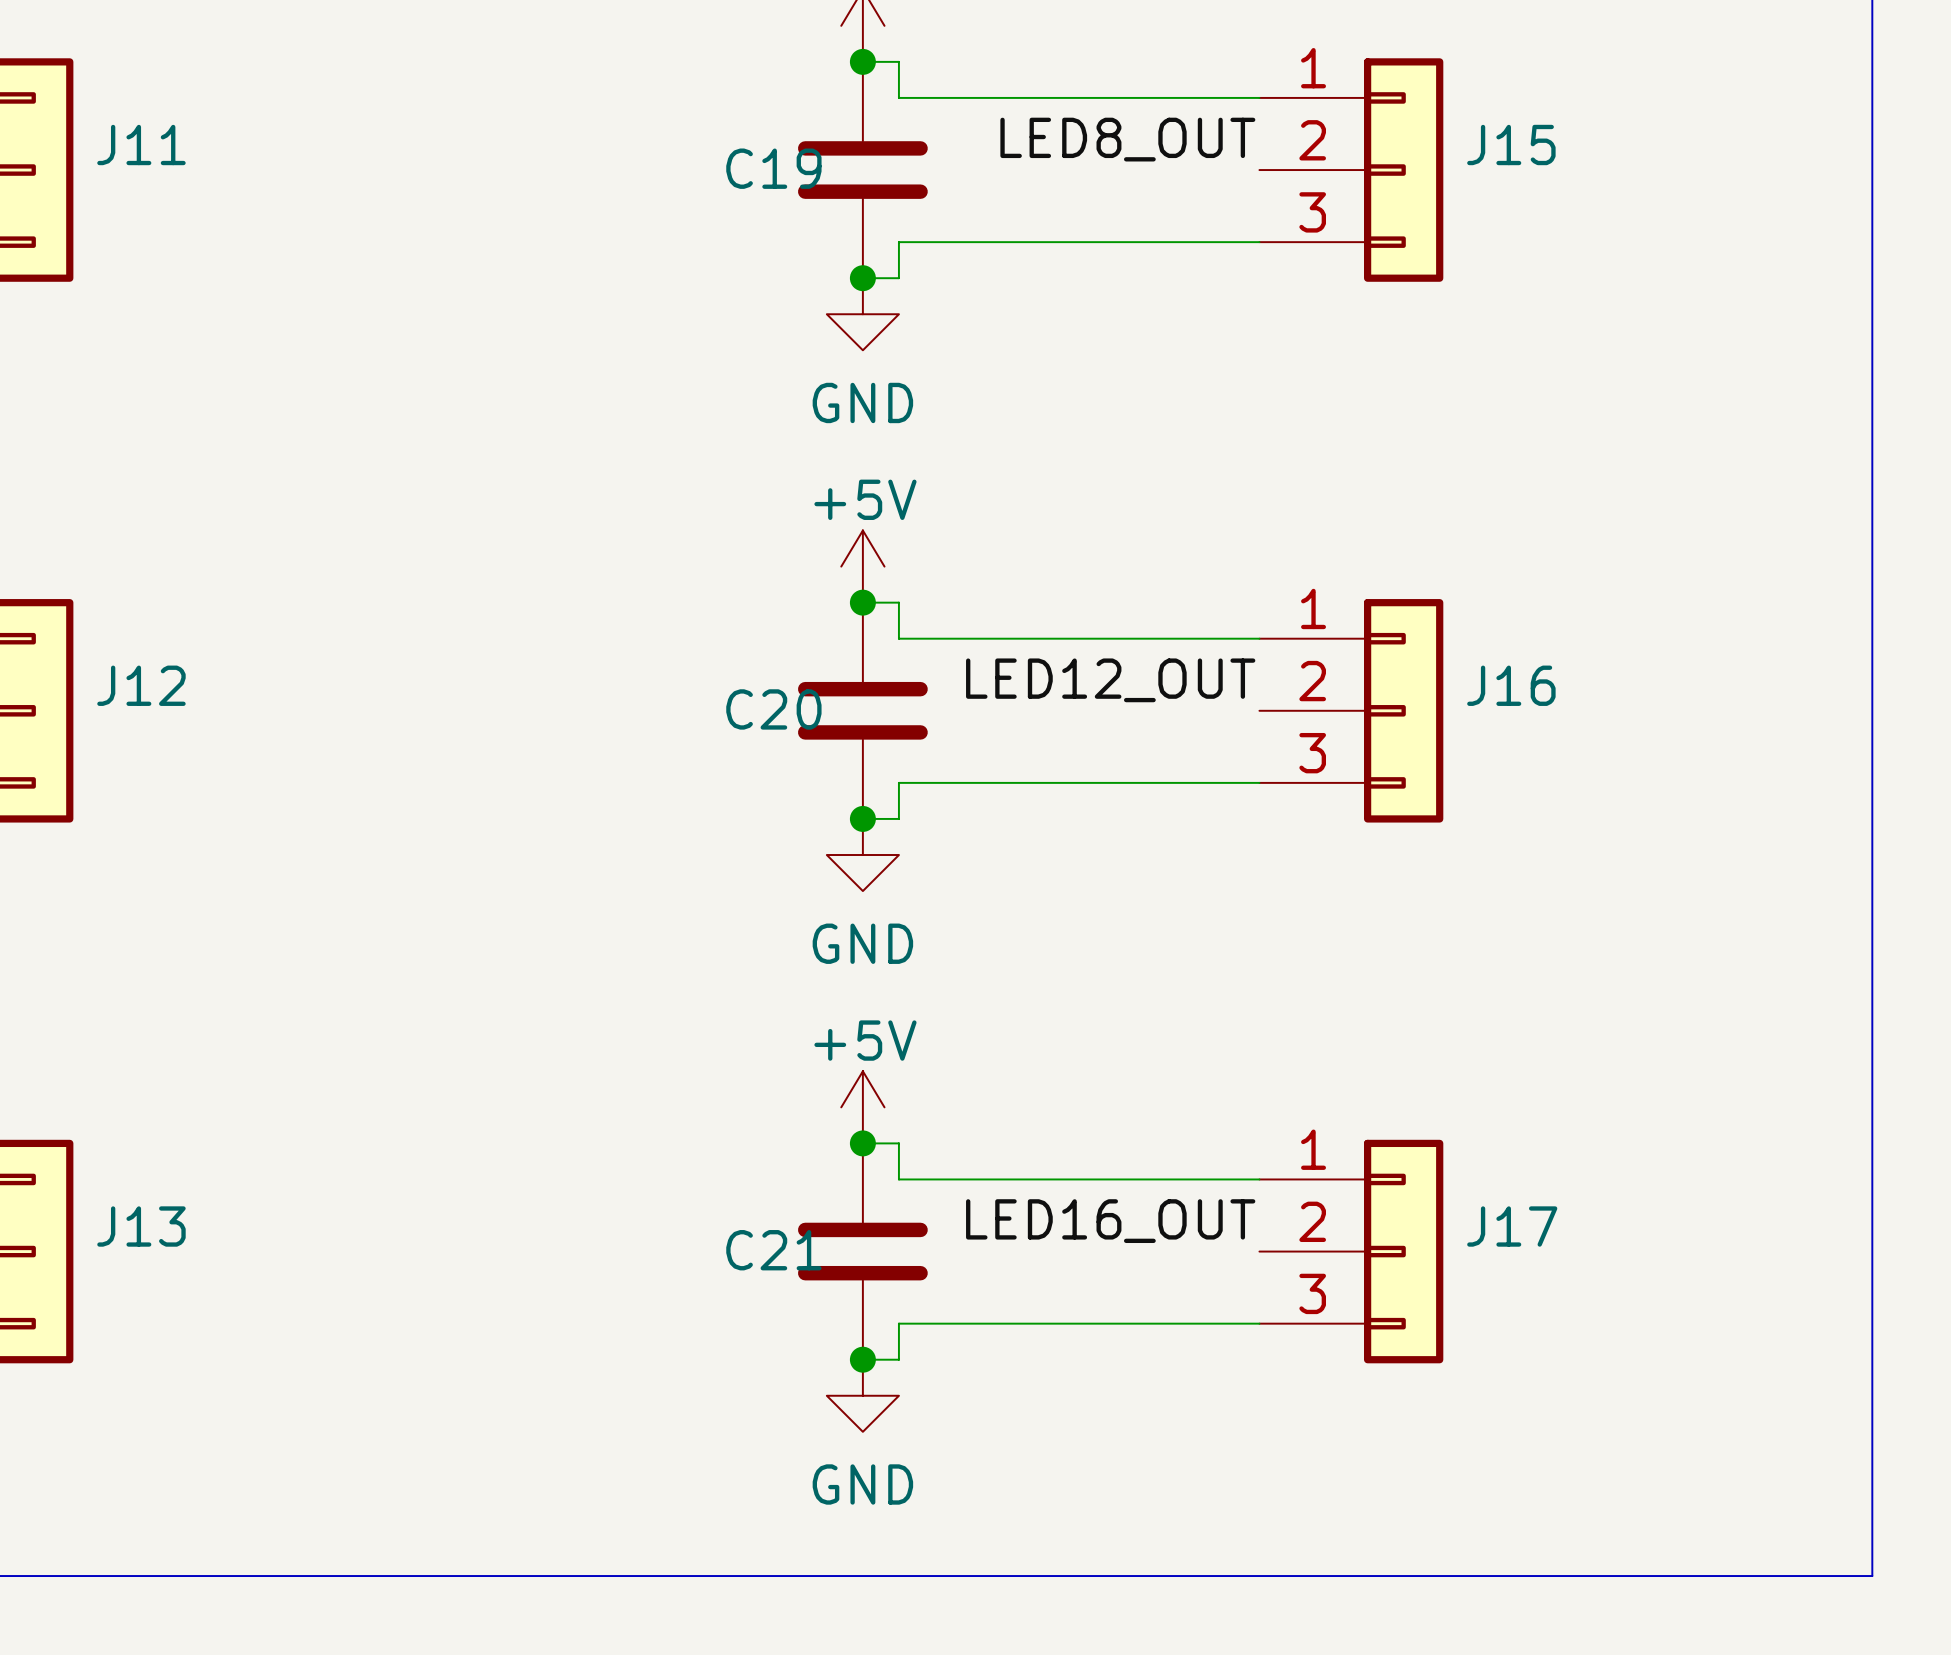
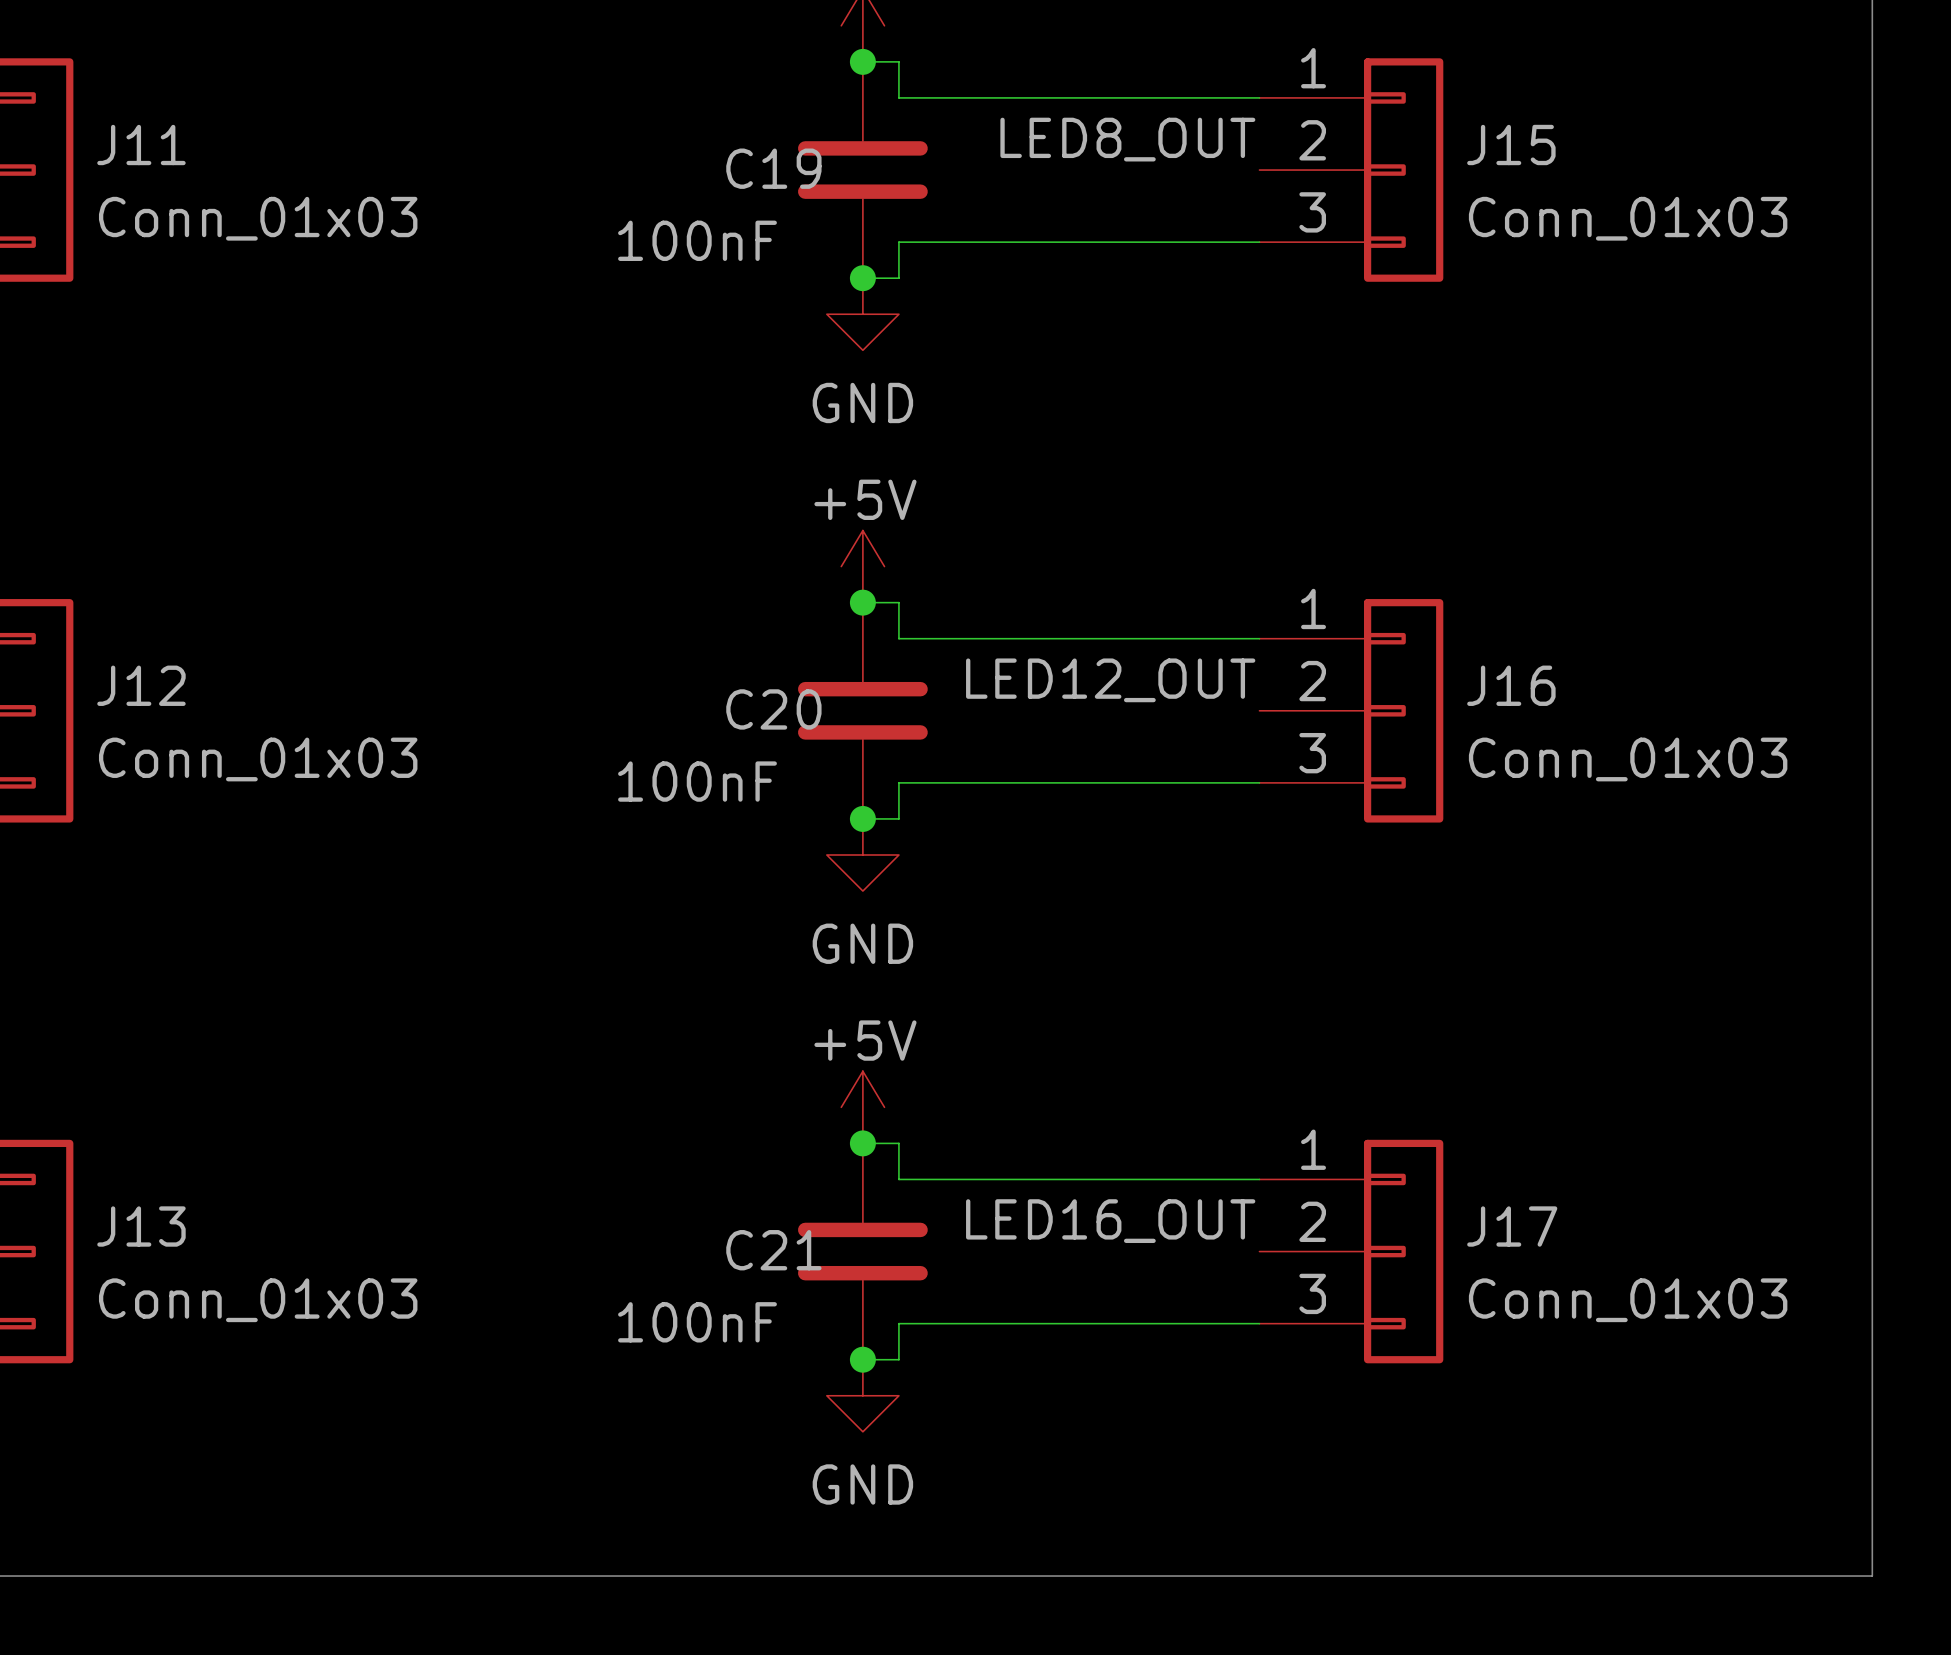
J11 value: none -> Conn_01x03 (258, 218)
J15 value: none -> Conn_01x03 (1628, 218)
C19 value: none -> 100nF (697, 240)
J12 value: none -> Conn_01x03 (258, 759)
J16 value: none -> Conn_01x03 (1628, 759)
C20 value: none -> 100nF (697, 781)
J13 value: none -> Conn_01x03 (258, 1300)
J17 value: none -> Conn_01x03 (1628, 1300)
C21 value: none -> 100nF (697, 1322)

